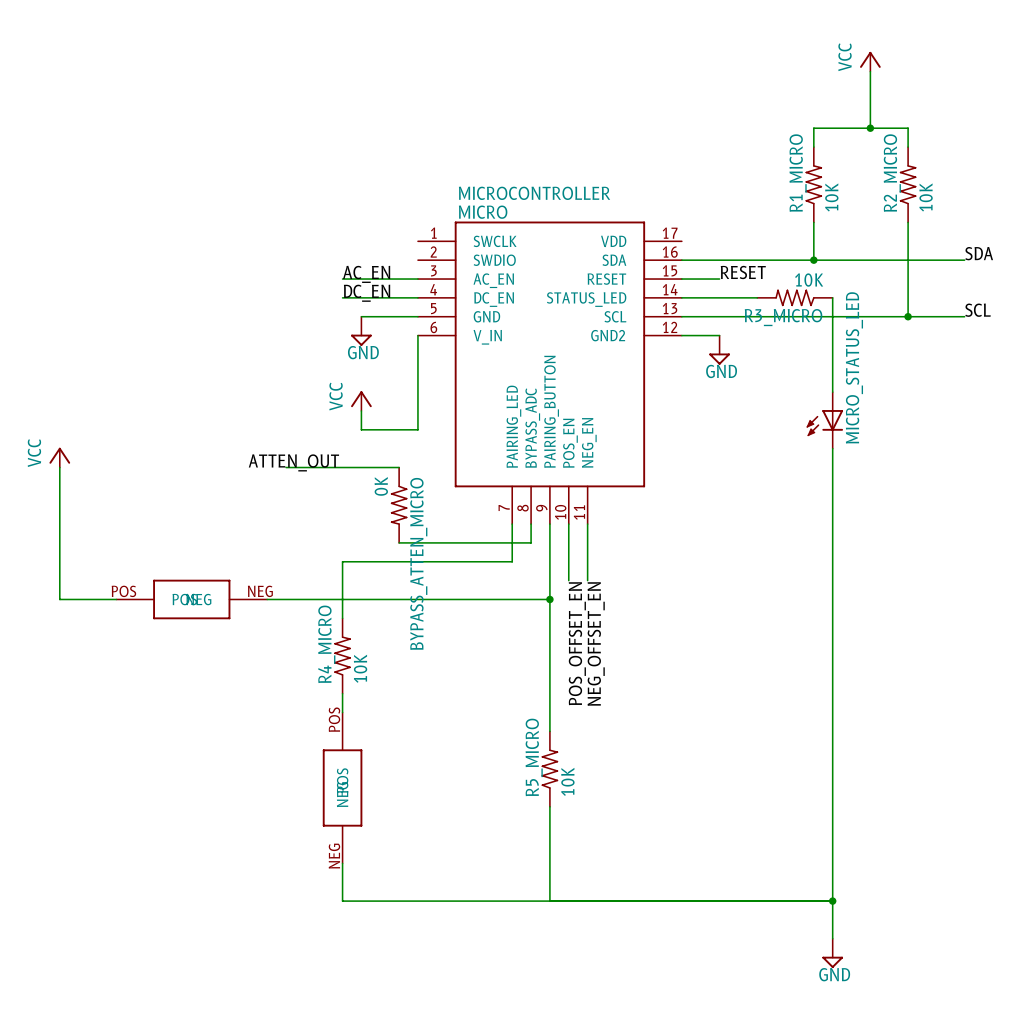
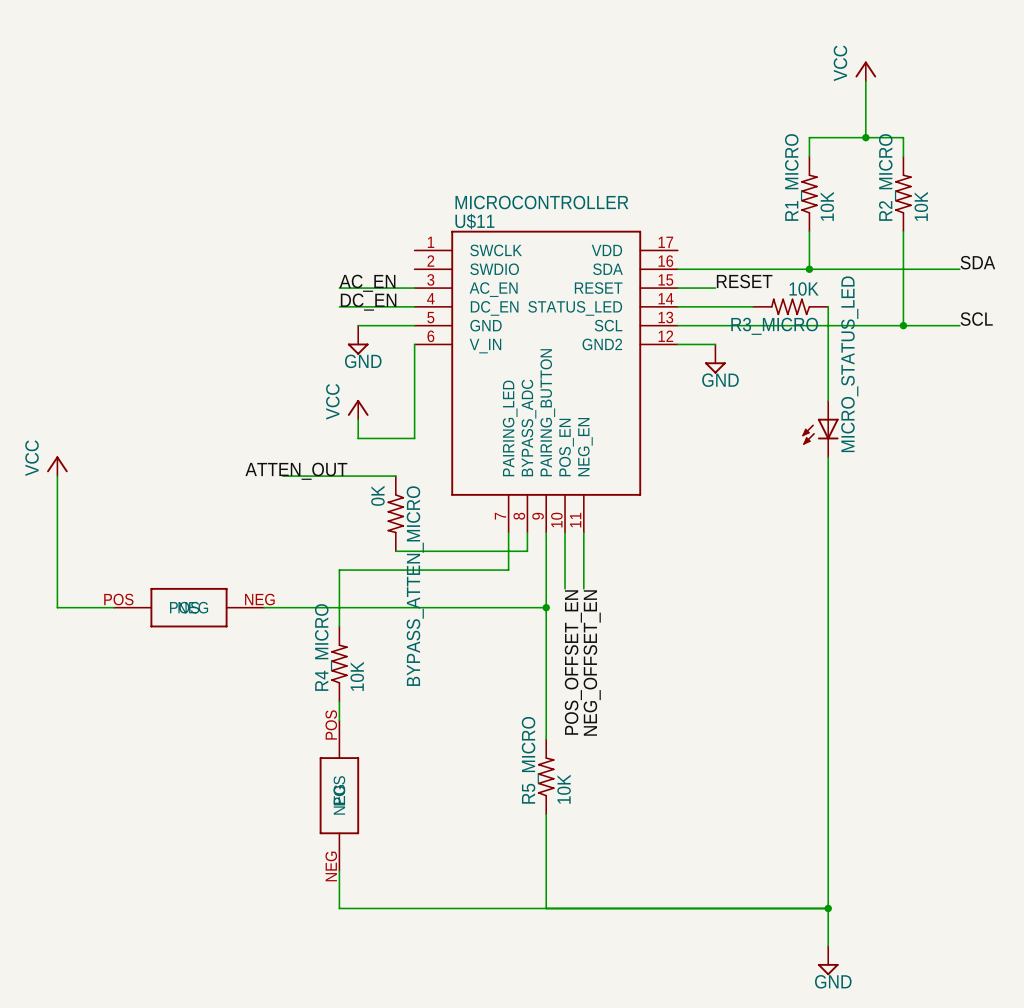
MICRO name: MICRO (483, 212) -> U$11 (474, 221)

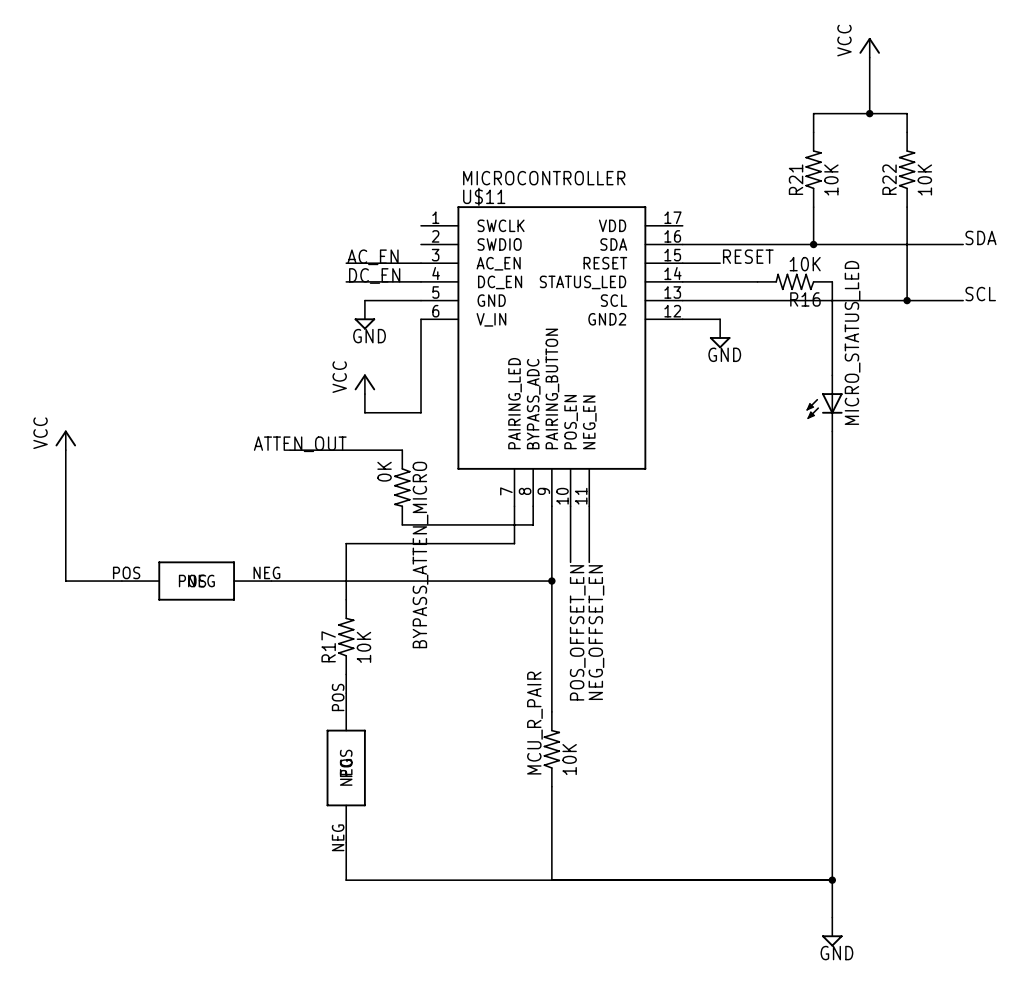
R1_MICRO name: R1_MICRO (793, 177) -> R21 (796, 179)
R2_MICRO name: R2_MICRO (887, 177) -> R22 (889, 179)
R3_MICRO name: R3_MICRO (774, 326) -> R16 (805, 299)
R4_MICRO name: R4_MICRO (323, 647) -> R17 (328, 646)
R5_MICRO name: R5_MICRO (530, 760) -> MCU_R_PAIR (534, 723)

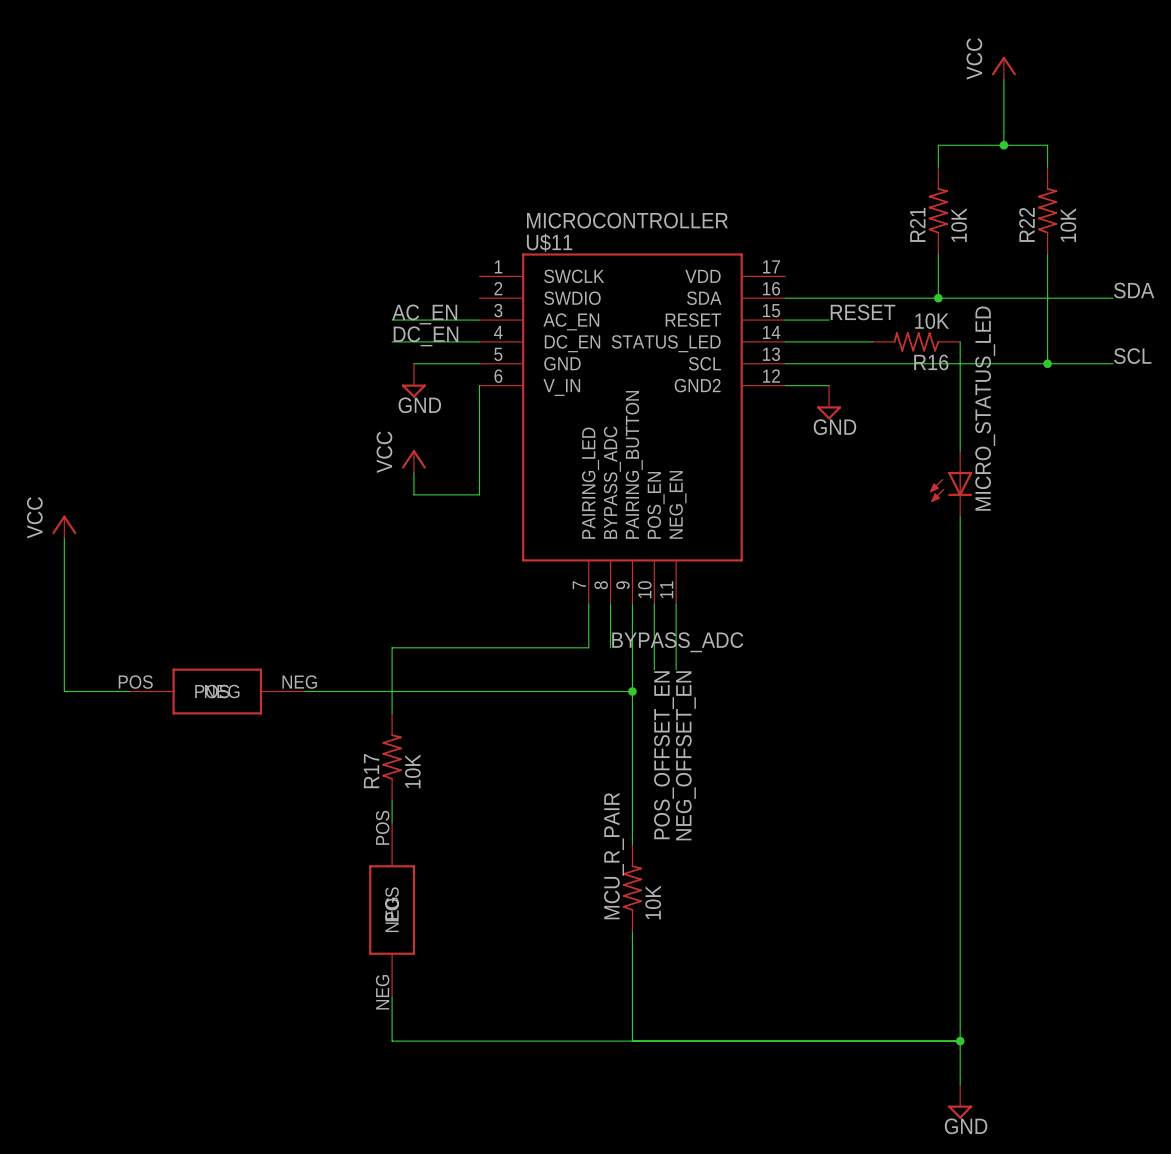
label: ATTEN_OUT (300, 444) -> none
wire: (290, 450) (402, 450) -> none
BYPASS_ATTEN_MICRO: 0K (402, 487) -> none
wire: (402, 524) (533, 524) -> (610, 647) (610, 625)
label: none -> BYPASS_ADC (677, 642)

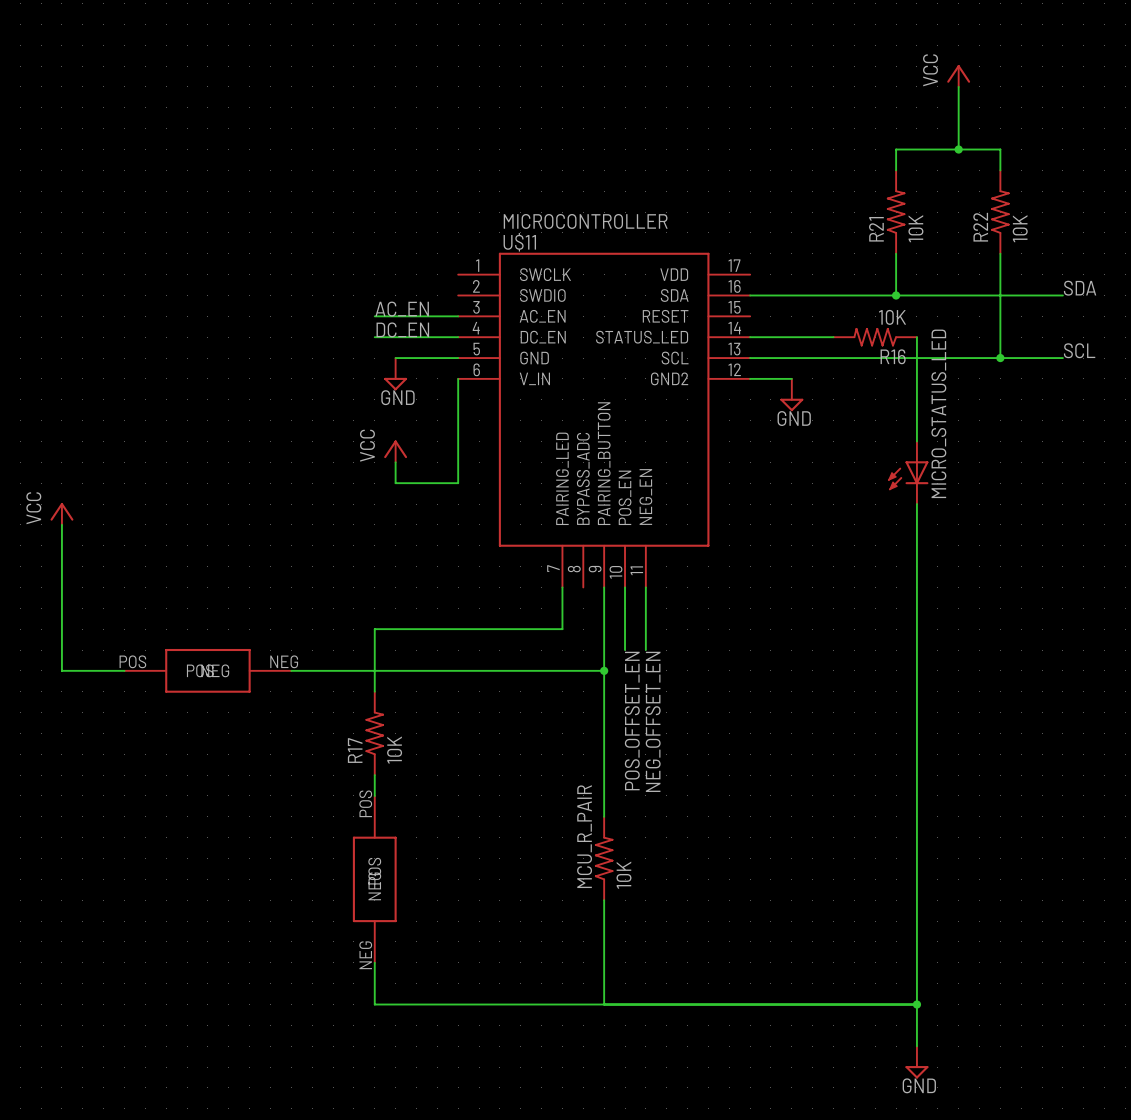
label: RESET (863, 312) -> none
wire: (785, 320) (829, 320) -> none
wire: (610, 604) (610, 647) -> none
label: BYPASS_ADC (677, 642) -> none

